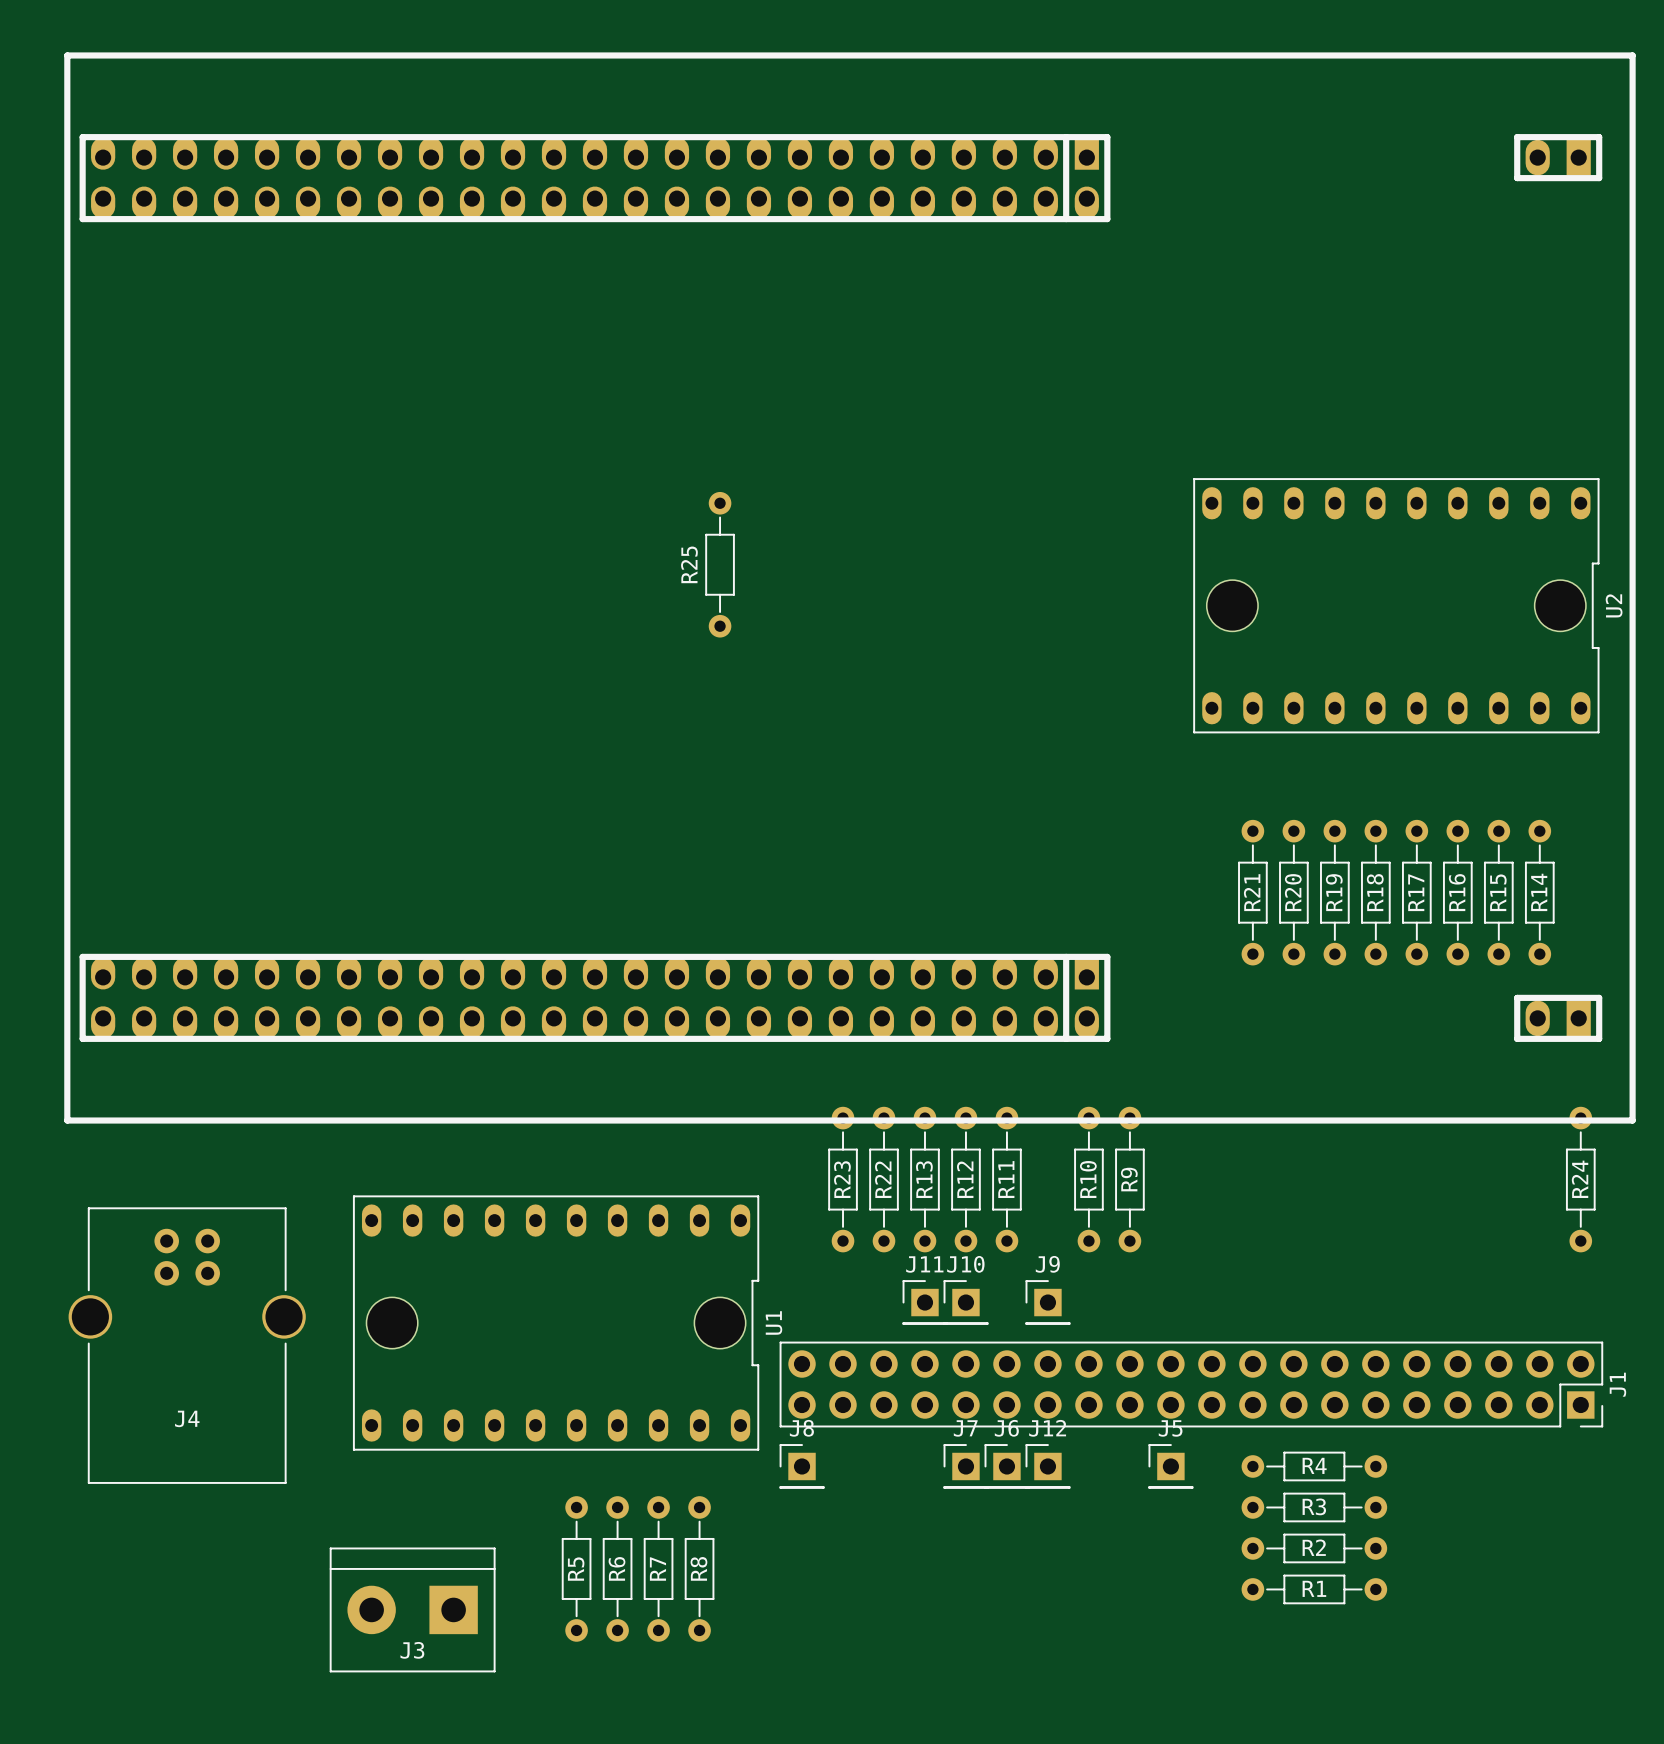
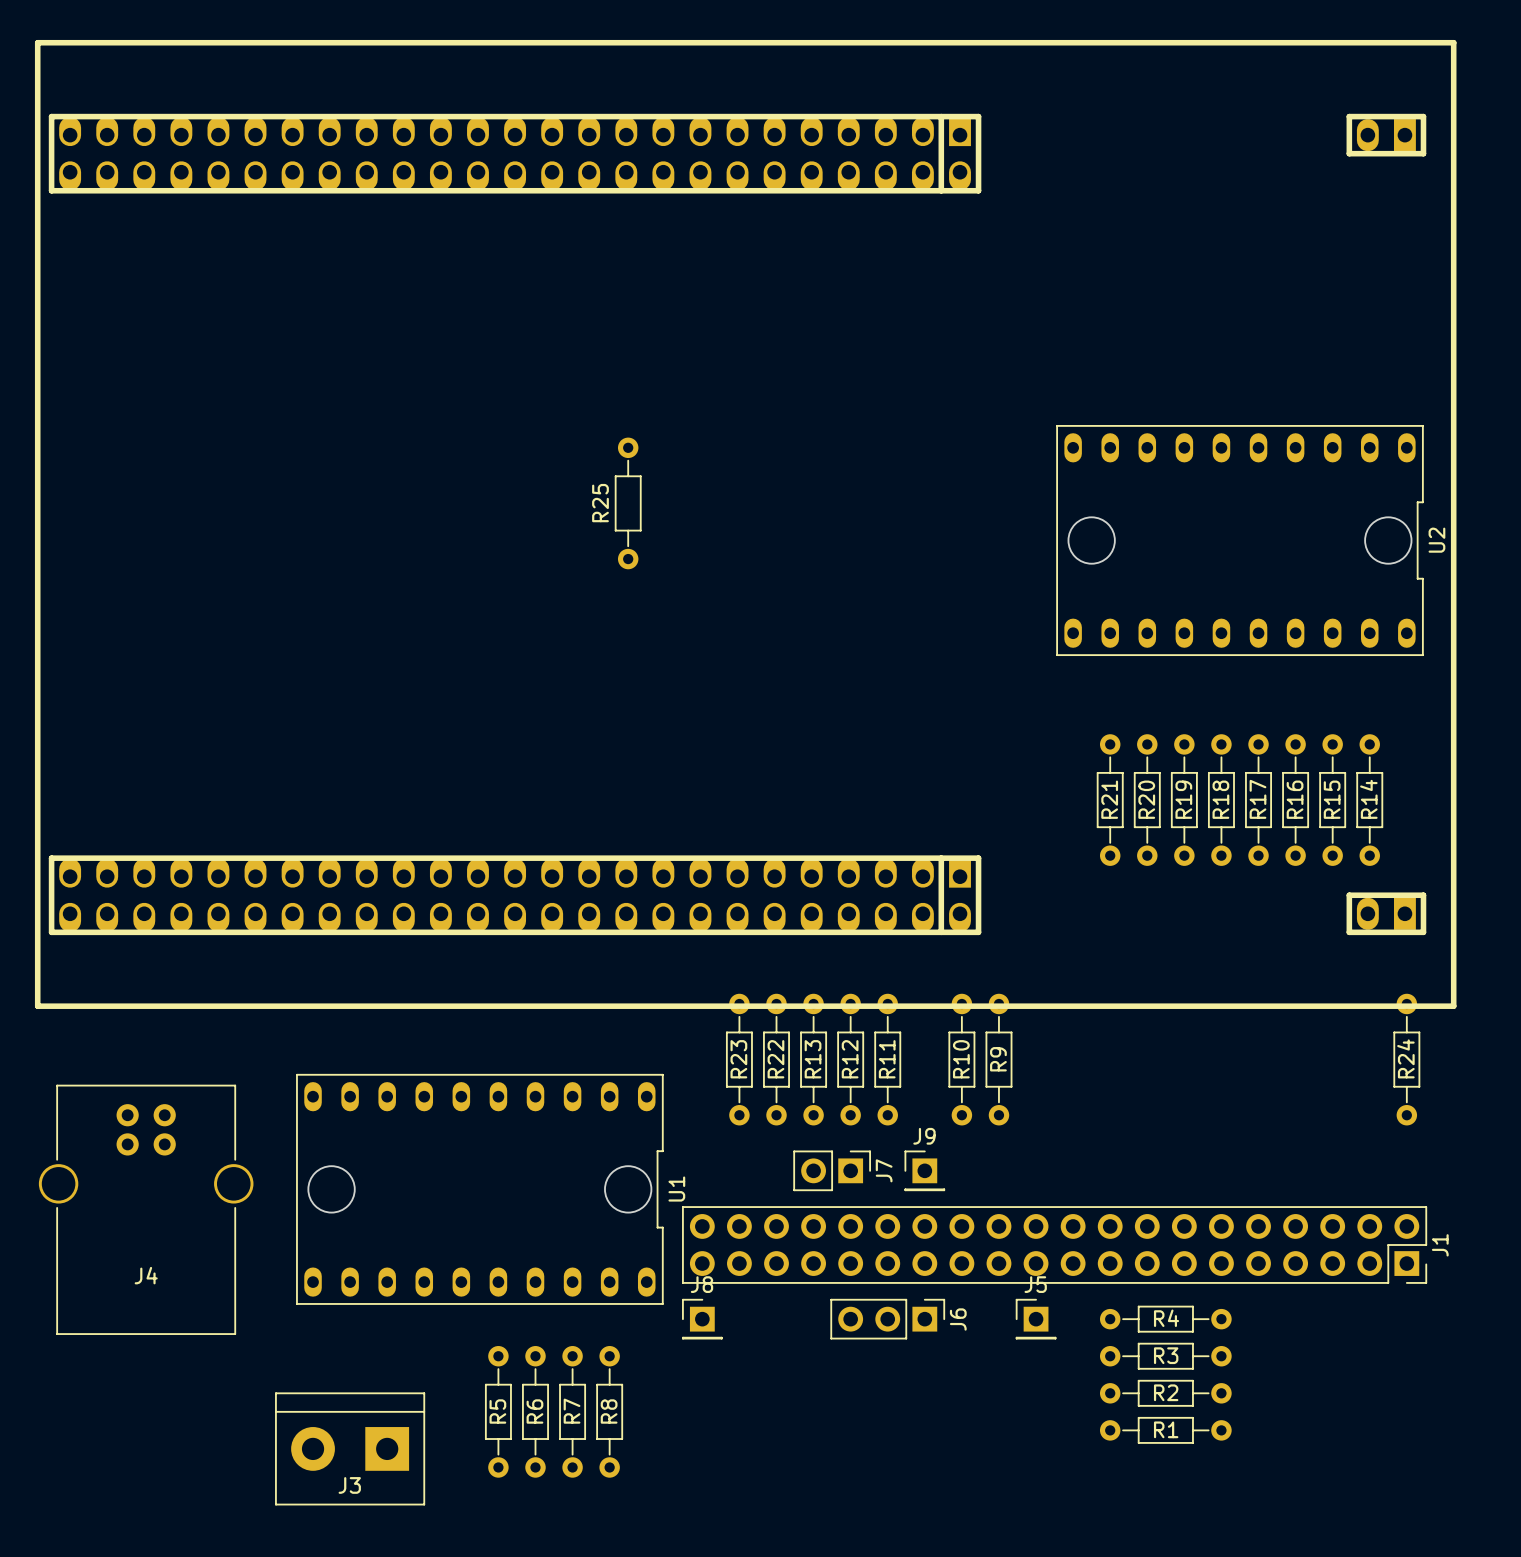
J11: (924, 1302) -> none
J10: (965, 1302) -> none
J7 name position: J7 (965, 1428) -> J7 (884, 1170)
J6 name position: J6 (1006, 1428) -> J6 (958, 1319)
J7 footprint: [943, 1444, 989, 1489] -> [793, 1150, 871, 1192]
J6 footprint: [984, 1444, 1030, 1489] -> [830, 1298, 946, 1340]
J12: (1047, 1466) -> none

